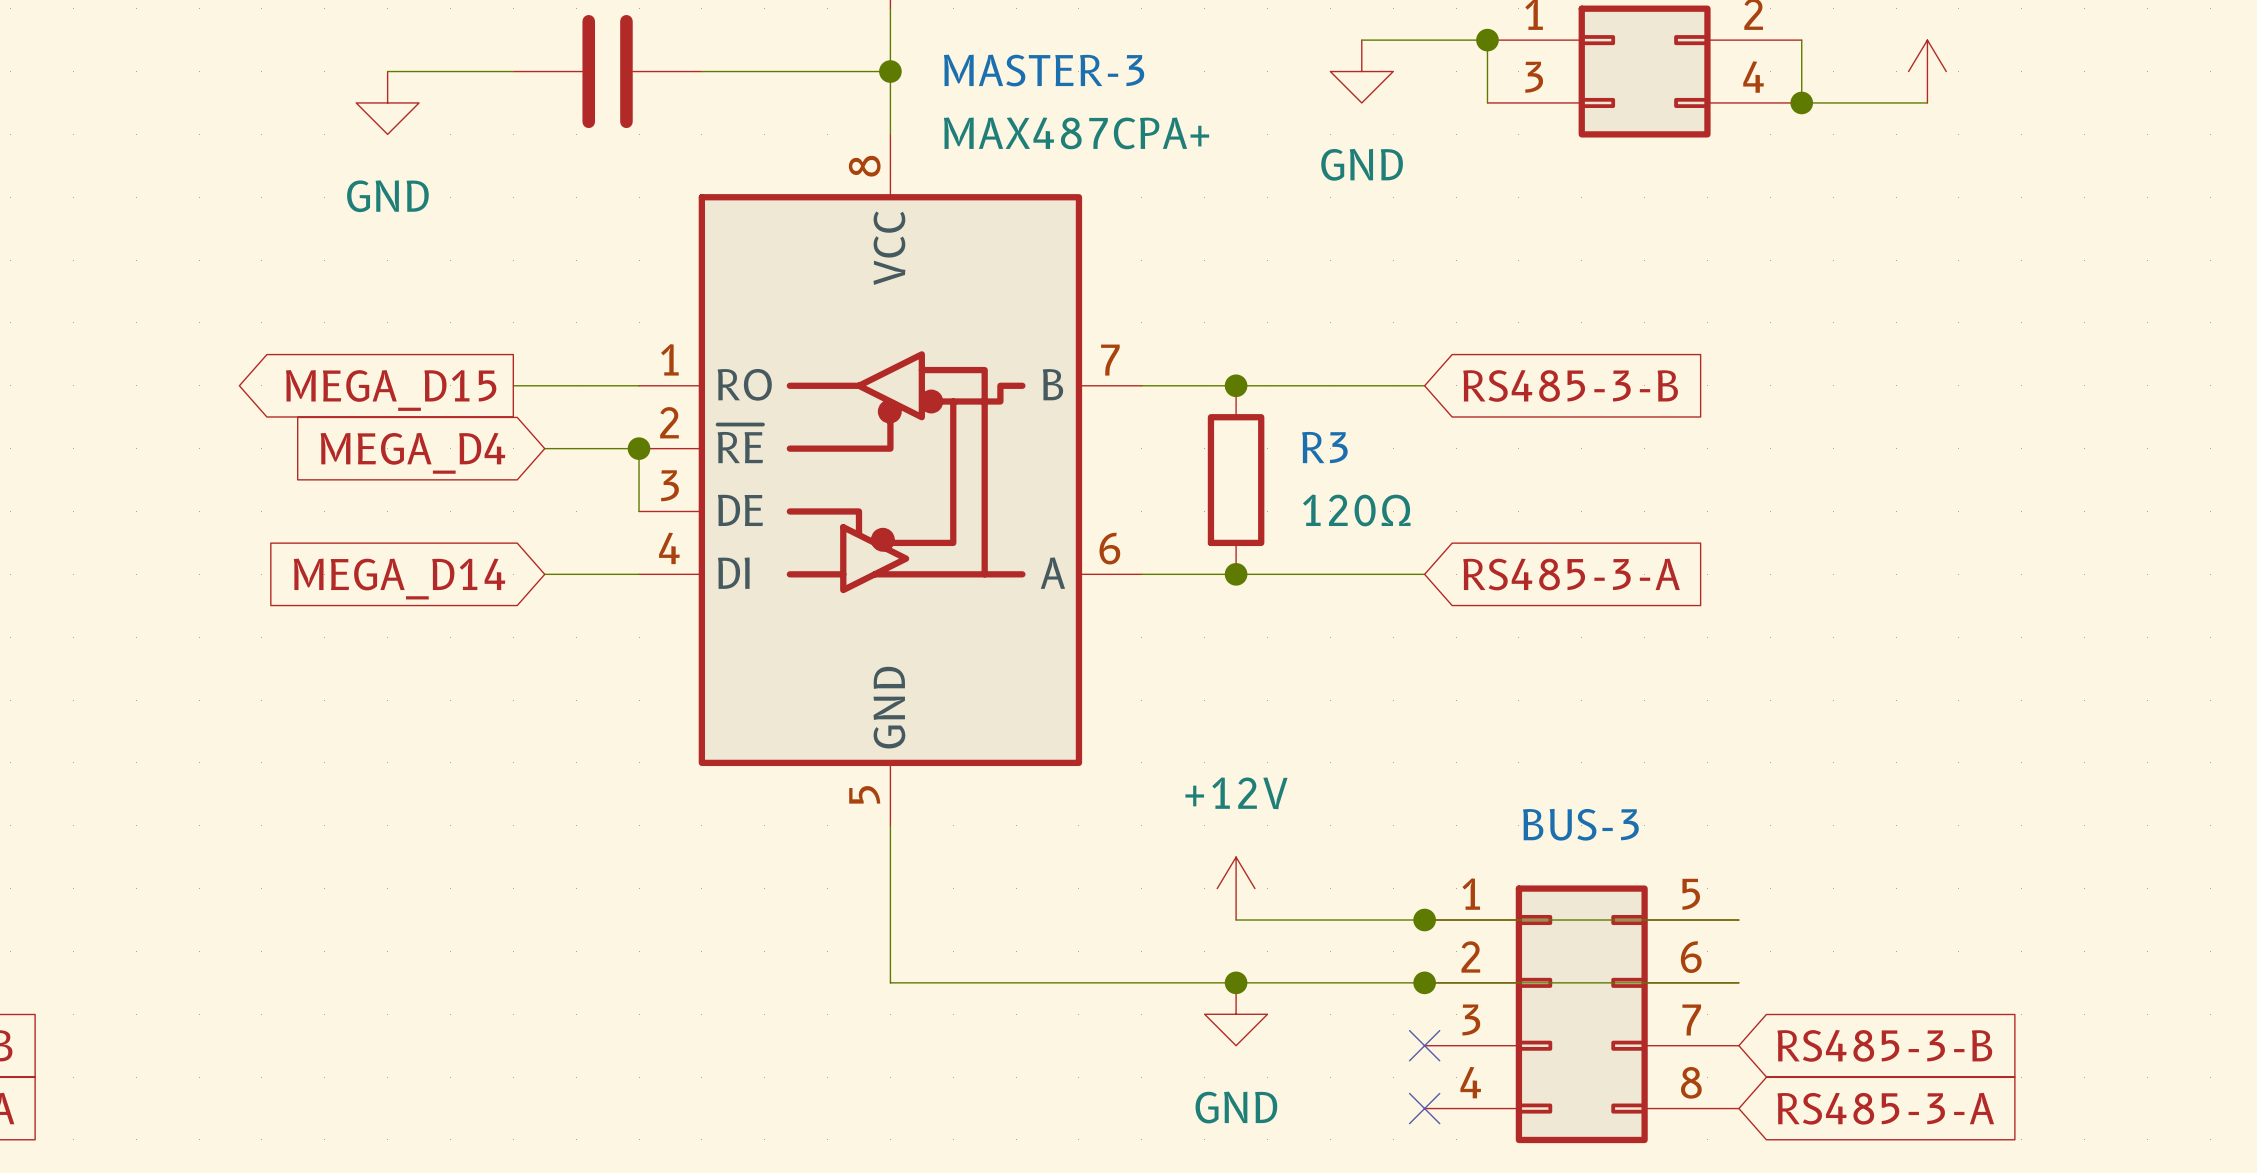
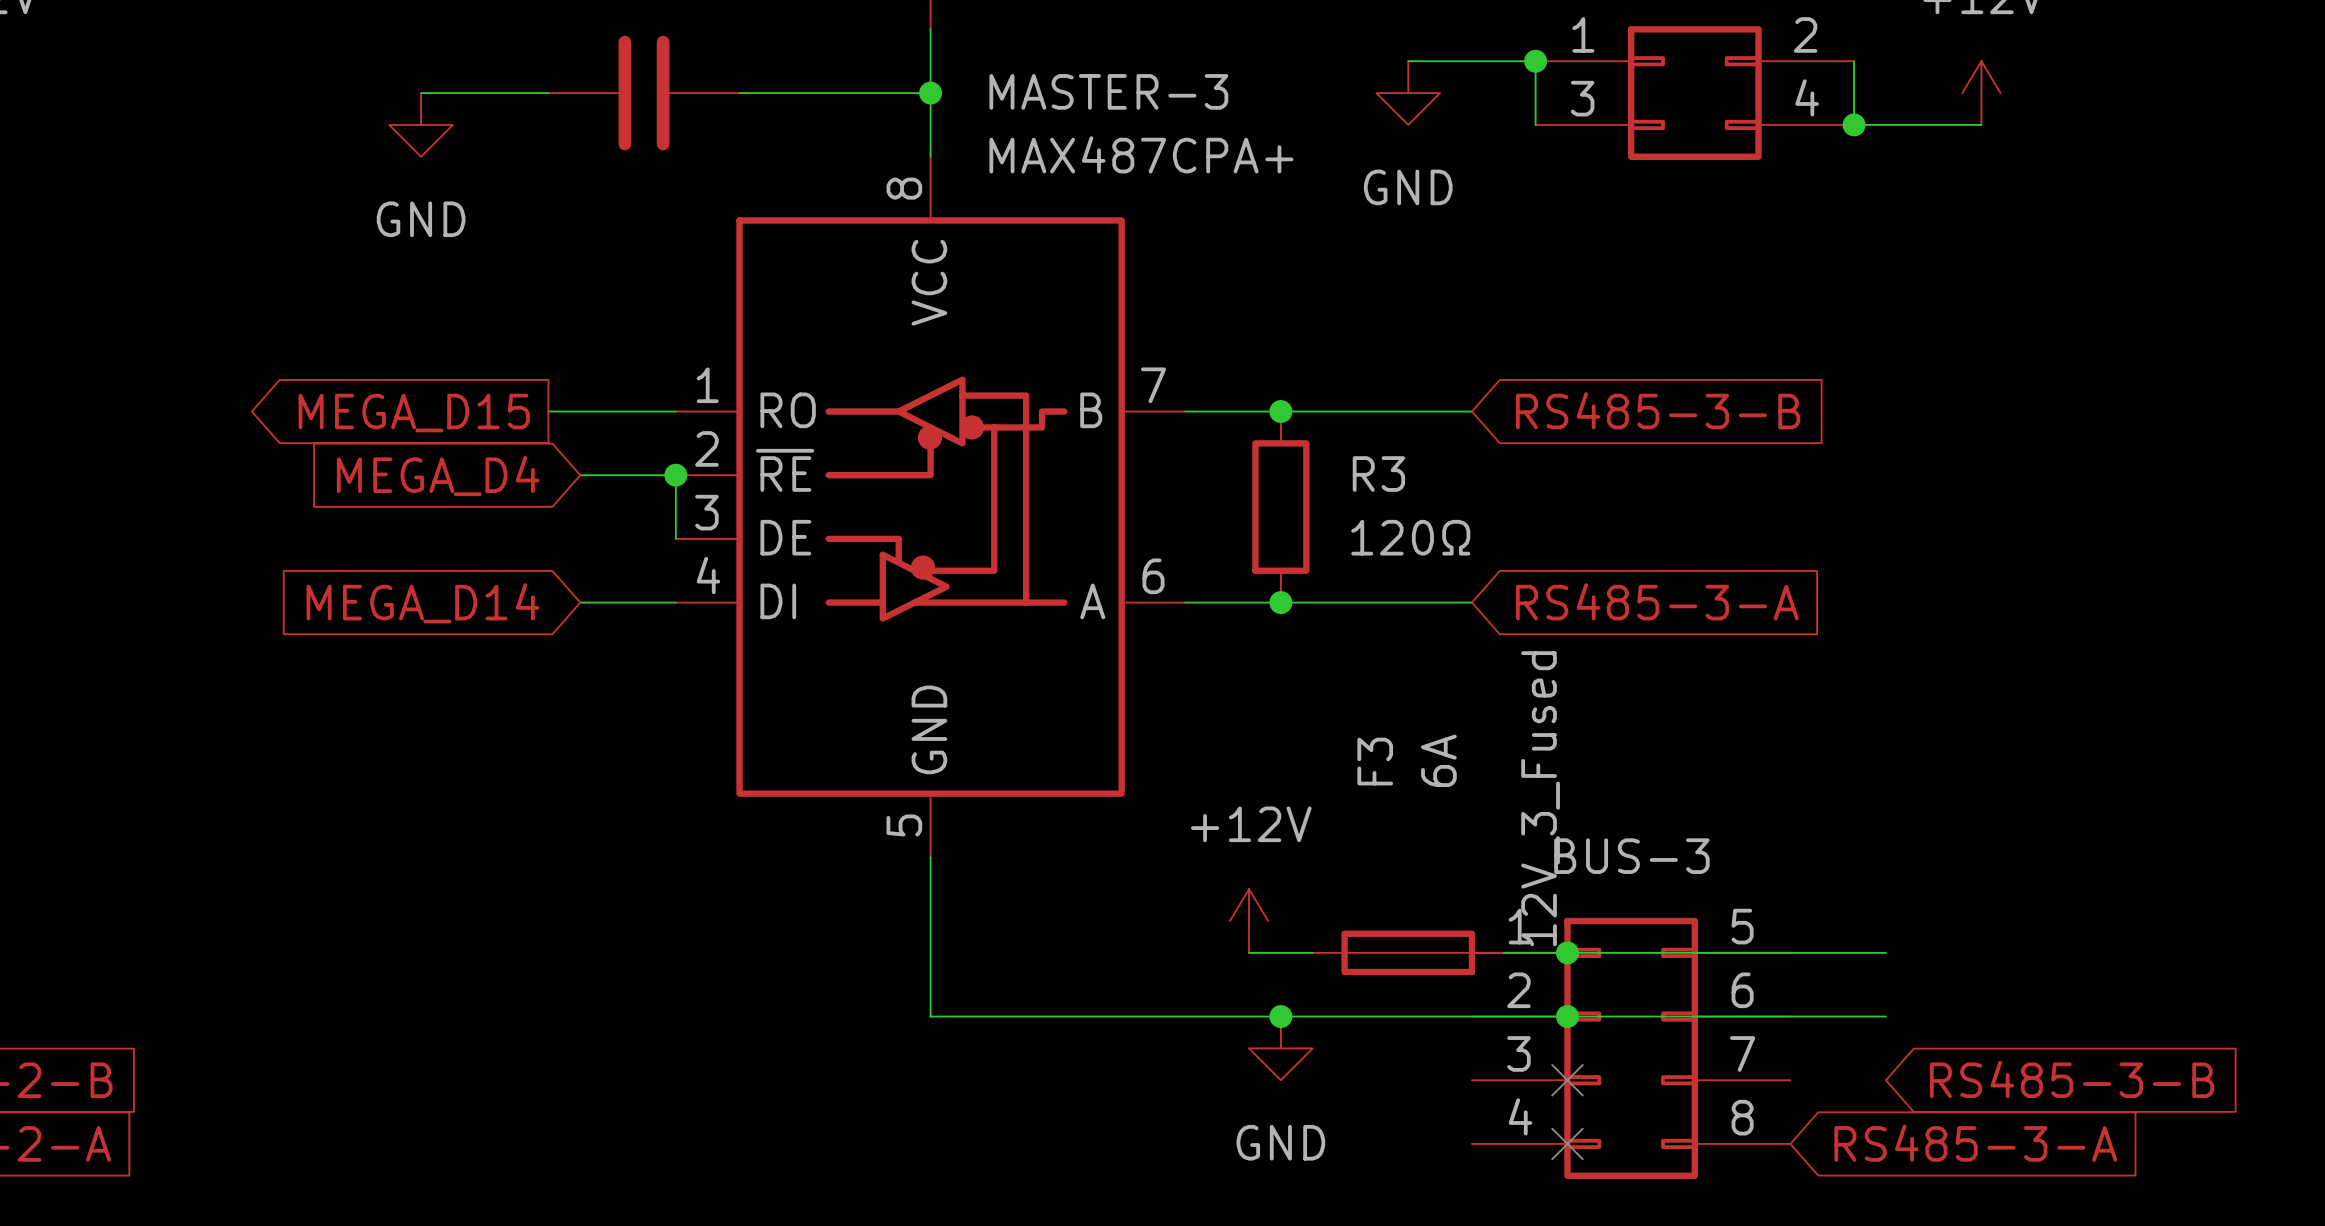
label: none -> 12V_3_Fused (1540, 798)
power symbol position: +12V (1236, 888) -> +12V (1249, 921)
wire: none -> (1249, 952) (1280, 952)
F3: none -> 6A (1408, 952)
junction: (1424, 920) -> none
junction: none -> (1567, 952)
wire: none -> (1790, 952) (1885, 952)
junction: (1424, 982) -> none
junction: none -> (1567, 1016)
wire: none -> (1790, 1016) (1885, 1016)
no-connect mark: (1424, 1045) -> none
no-connect mark: none -> (1567, 1080)
global label position: RS485-3-B (1884, 1045) -> RS485-3-B (2072, 1079)
no-connect mark: (1424, 1108) -> none
no-connect mark: none -> (1567, 1143)

